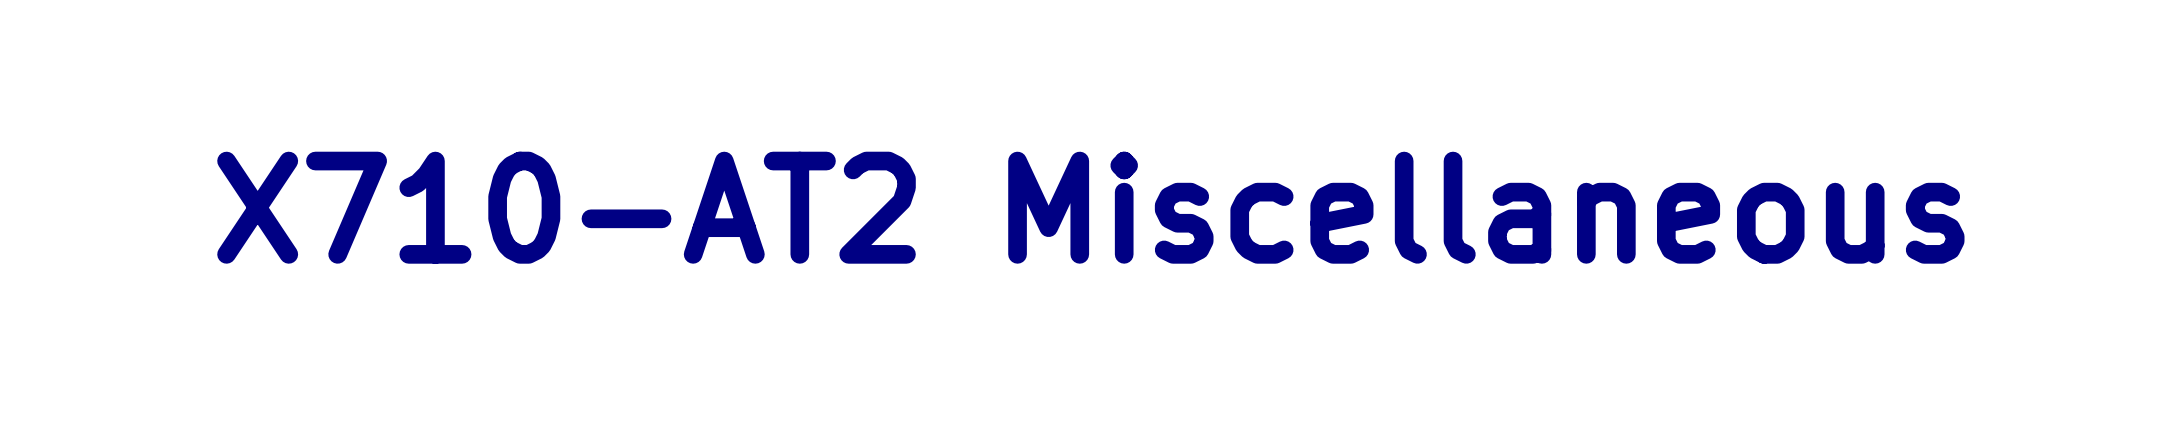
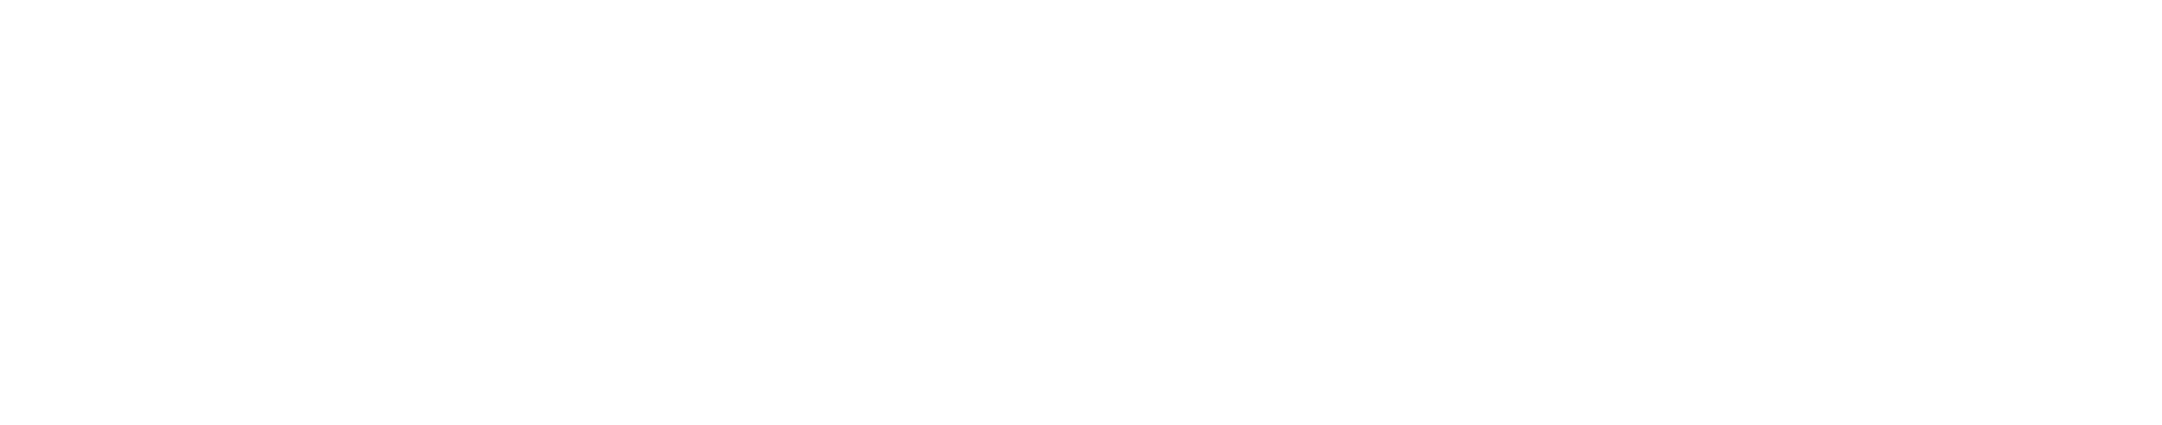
text: X710-AT2 Miscellaneous (1090, 207) -> none

